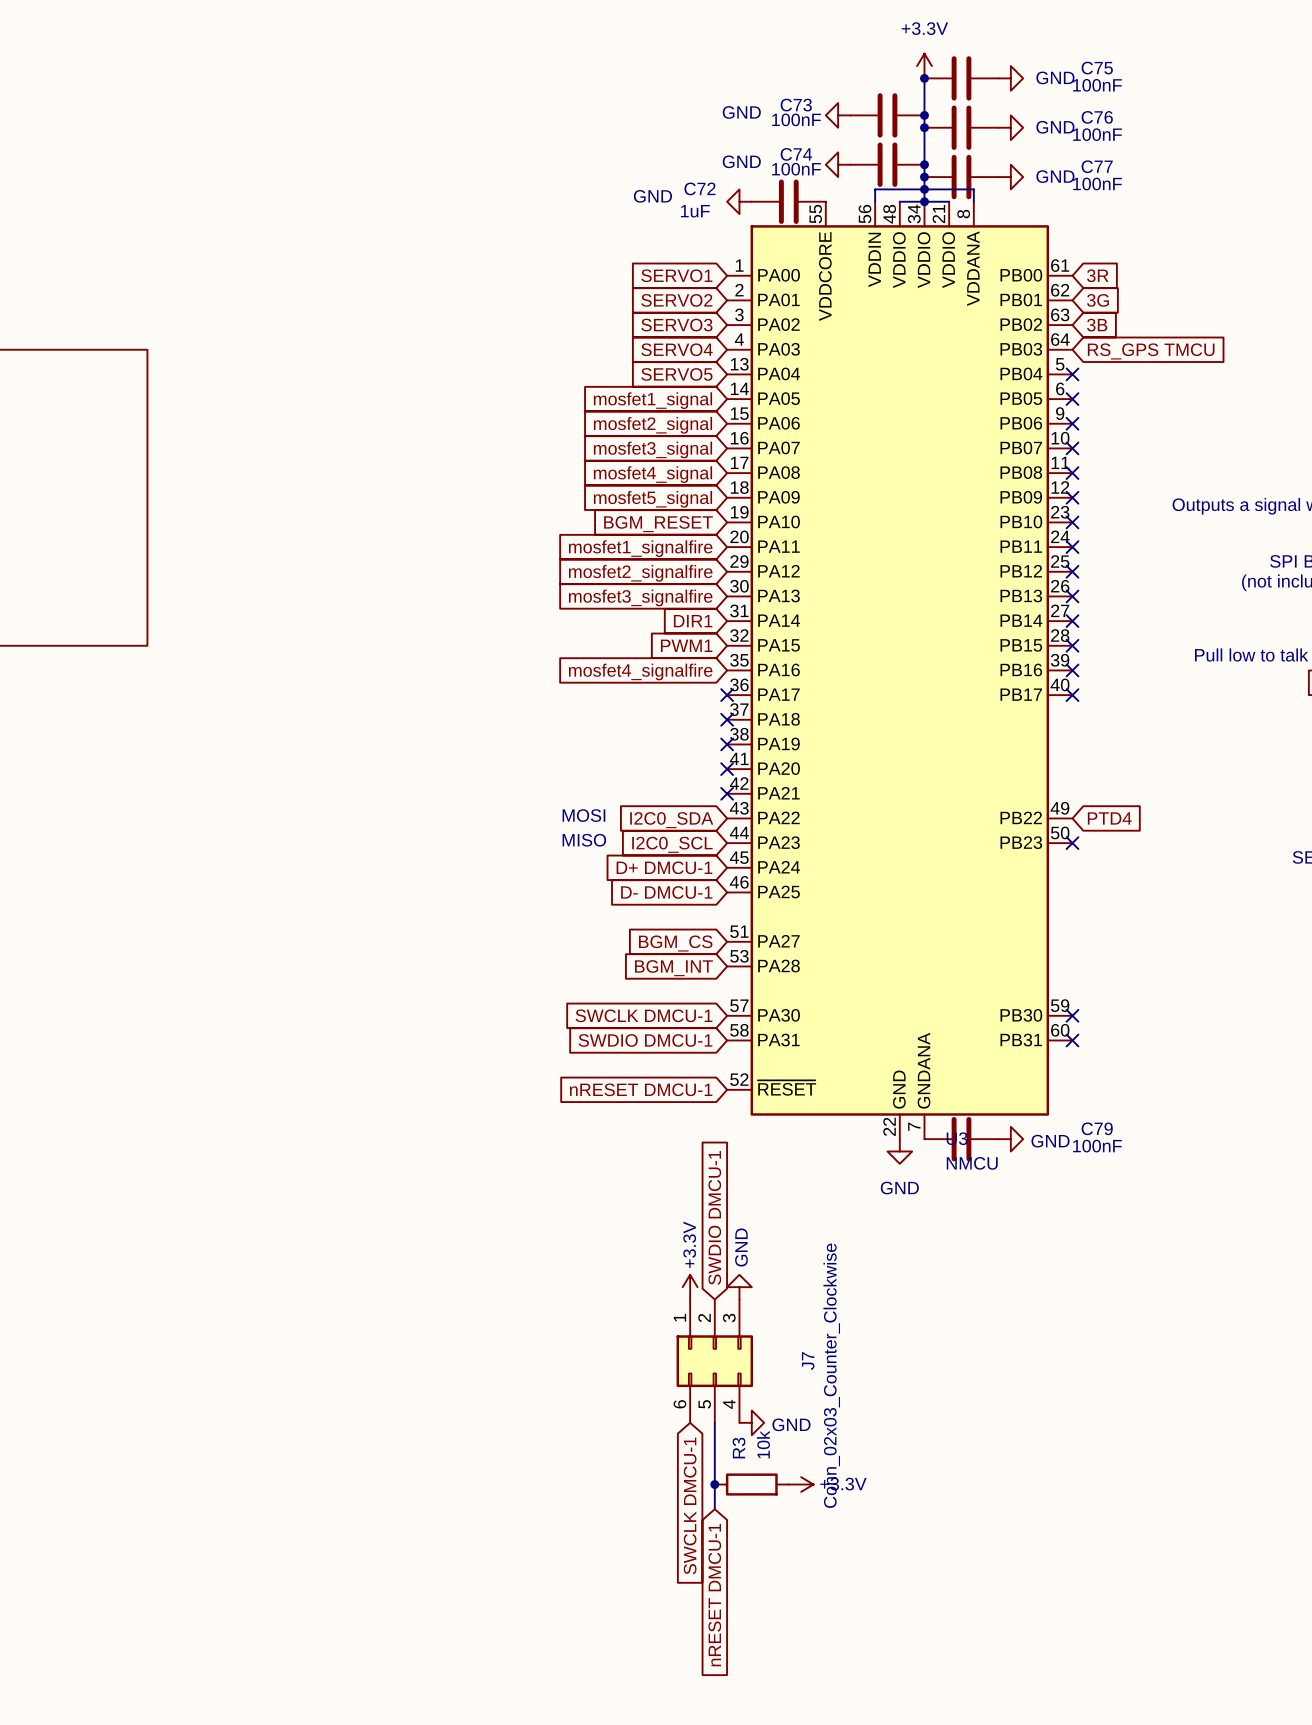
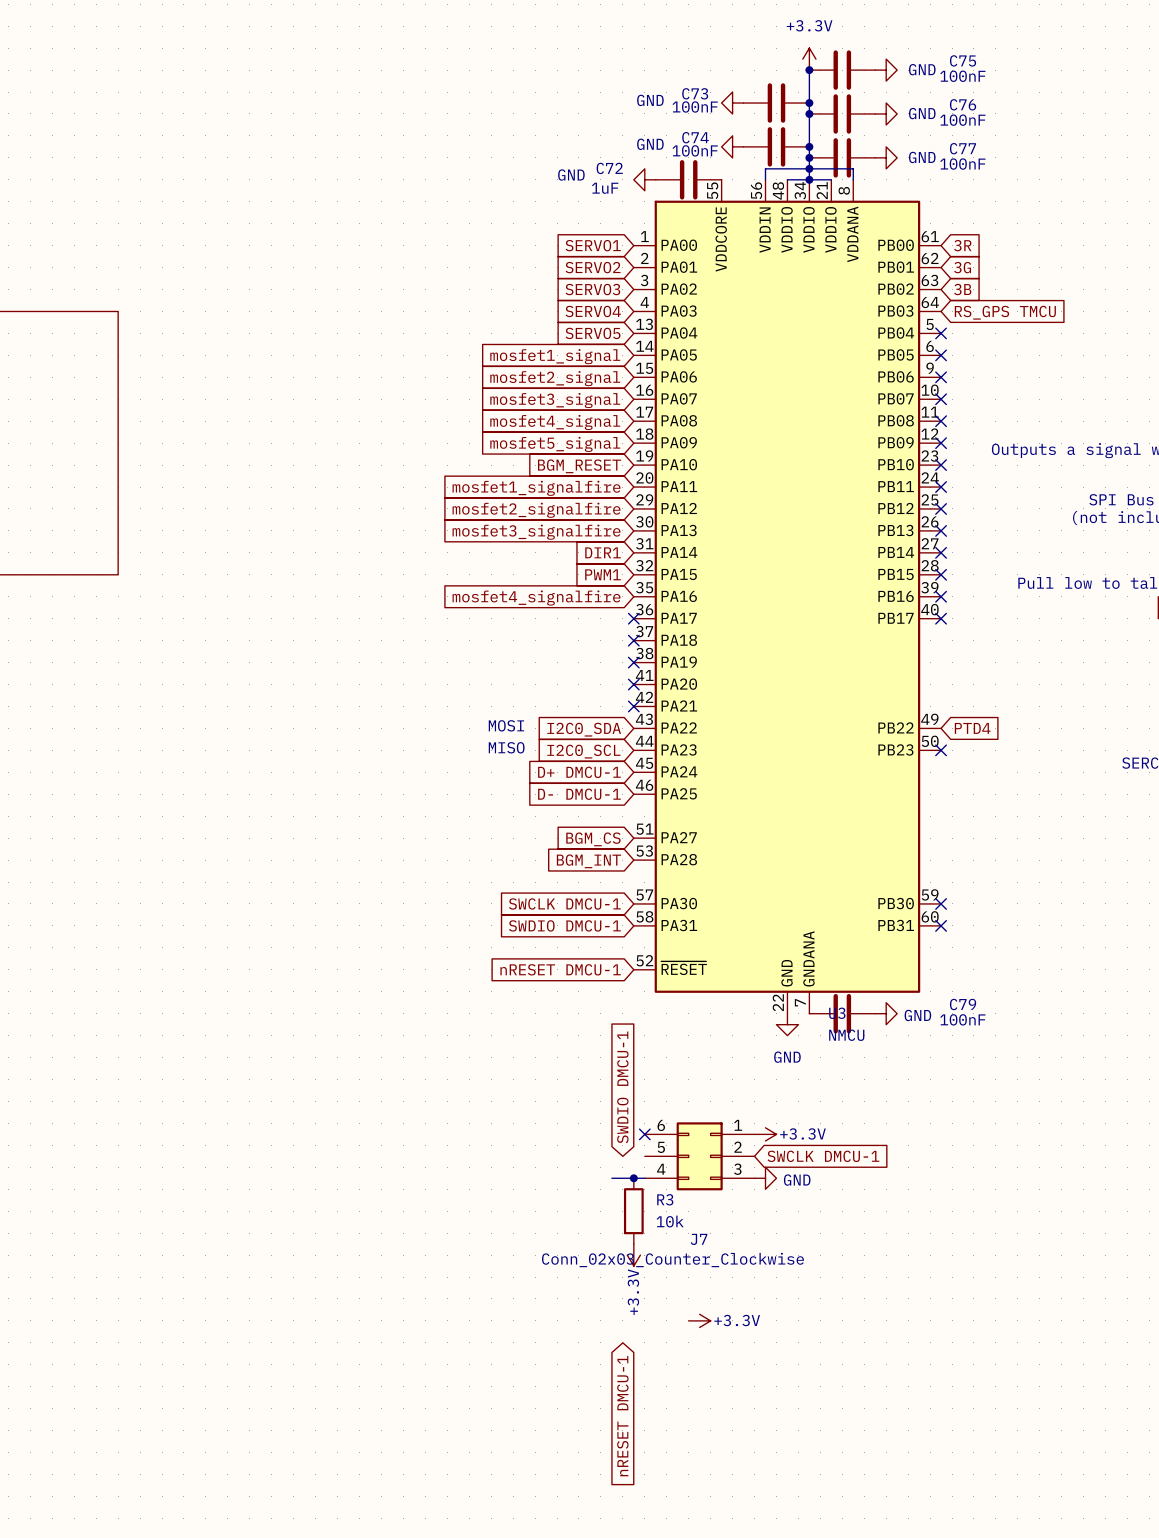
no-connect mark: none -> (644, 1134)
power symbol: none -> +3.3V (765, 1134)
power symbol: +3.3V (690, 1287) -> none
power symbol: GND (739, 1287) -> none
wire: none -> (611, 1178) (644, 1178)
junction: none -> (633, 1178)
power symbol: none -> GND (765, 1178)
J7 rotation: 0° (714, 1361) -> 90° clockwise (699, 1156)
J7 position: (714, 1361) -> (699, 1156)
power symbol: none -> +3.3V (633, 1255)
wire: (714, 1422) (714, 1509) -> none
power symbol: GND (751, 1422) -> none
junction: (714, 1484) -> none
R3 rotation: 0° (751, 1484) -> 90° clockwise (633, 1211)
R3 position: (751, 1484) -> (633, 1211)
global label rotation: 0° (690, 1505) -> 90° counterclockwise (823, 1156)
global label position: SWCLK DMCU-1 (690, 1505) -> SWCLK DMCU-1 (823, 1156)

